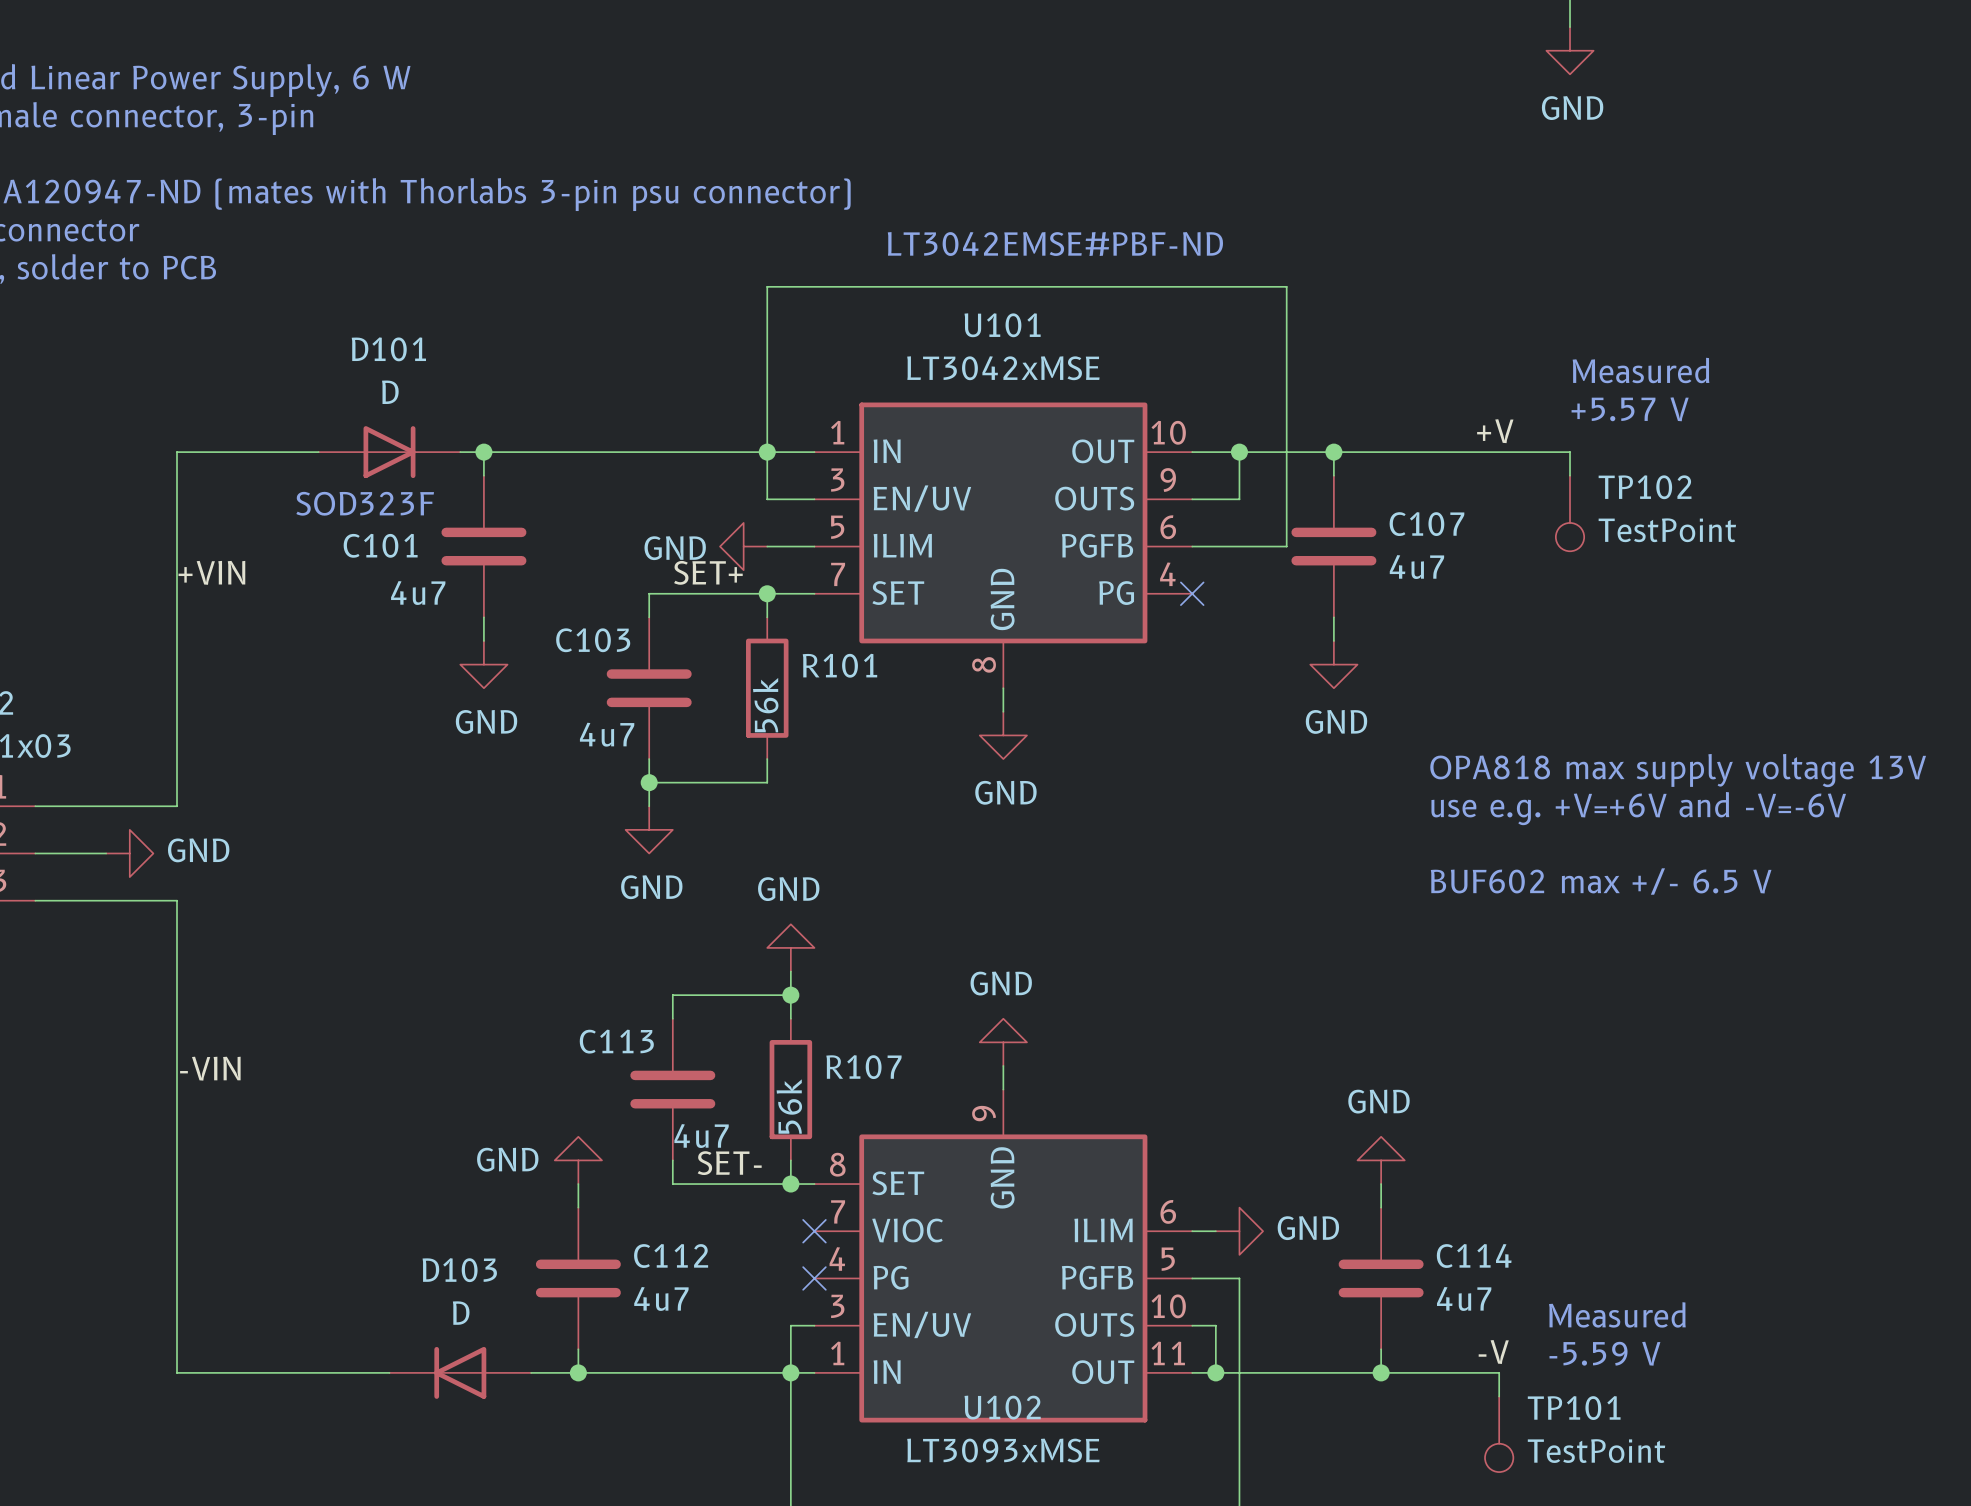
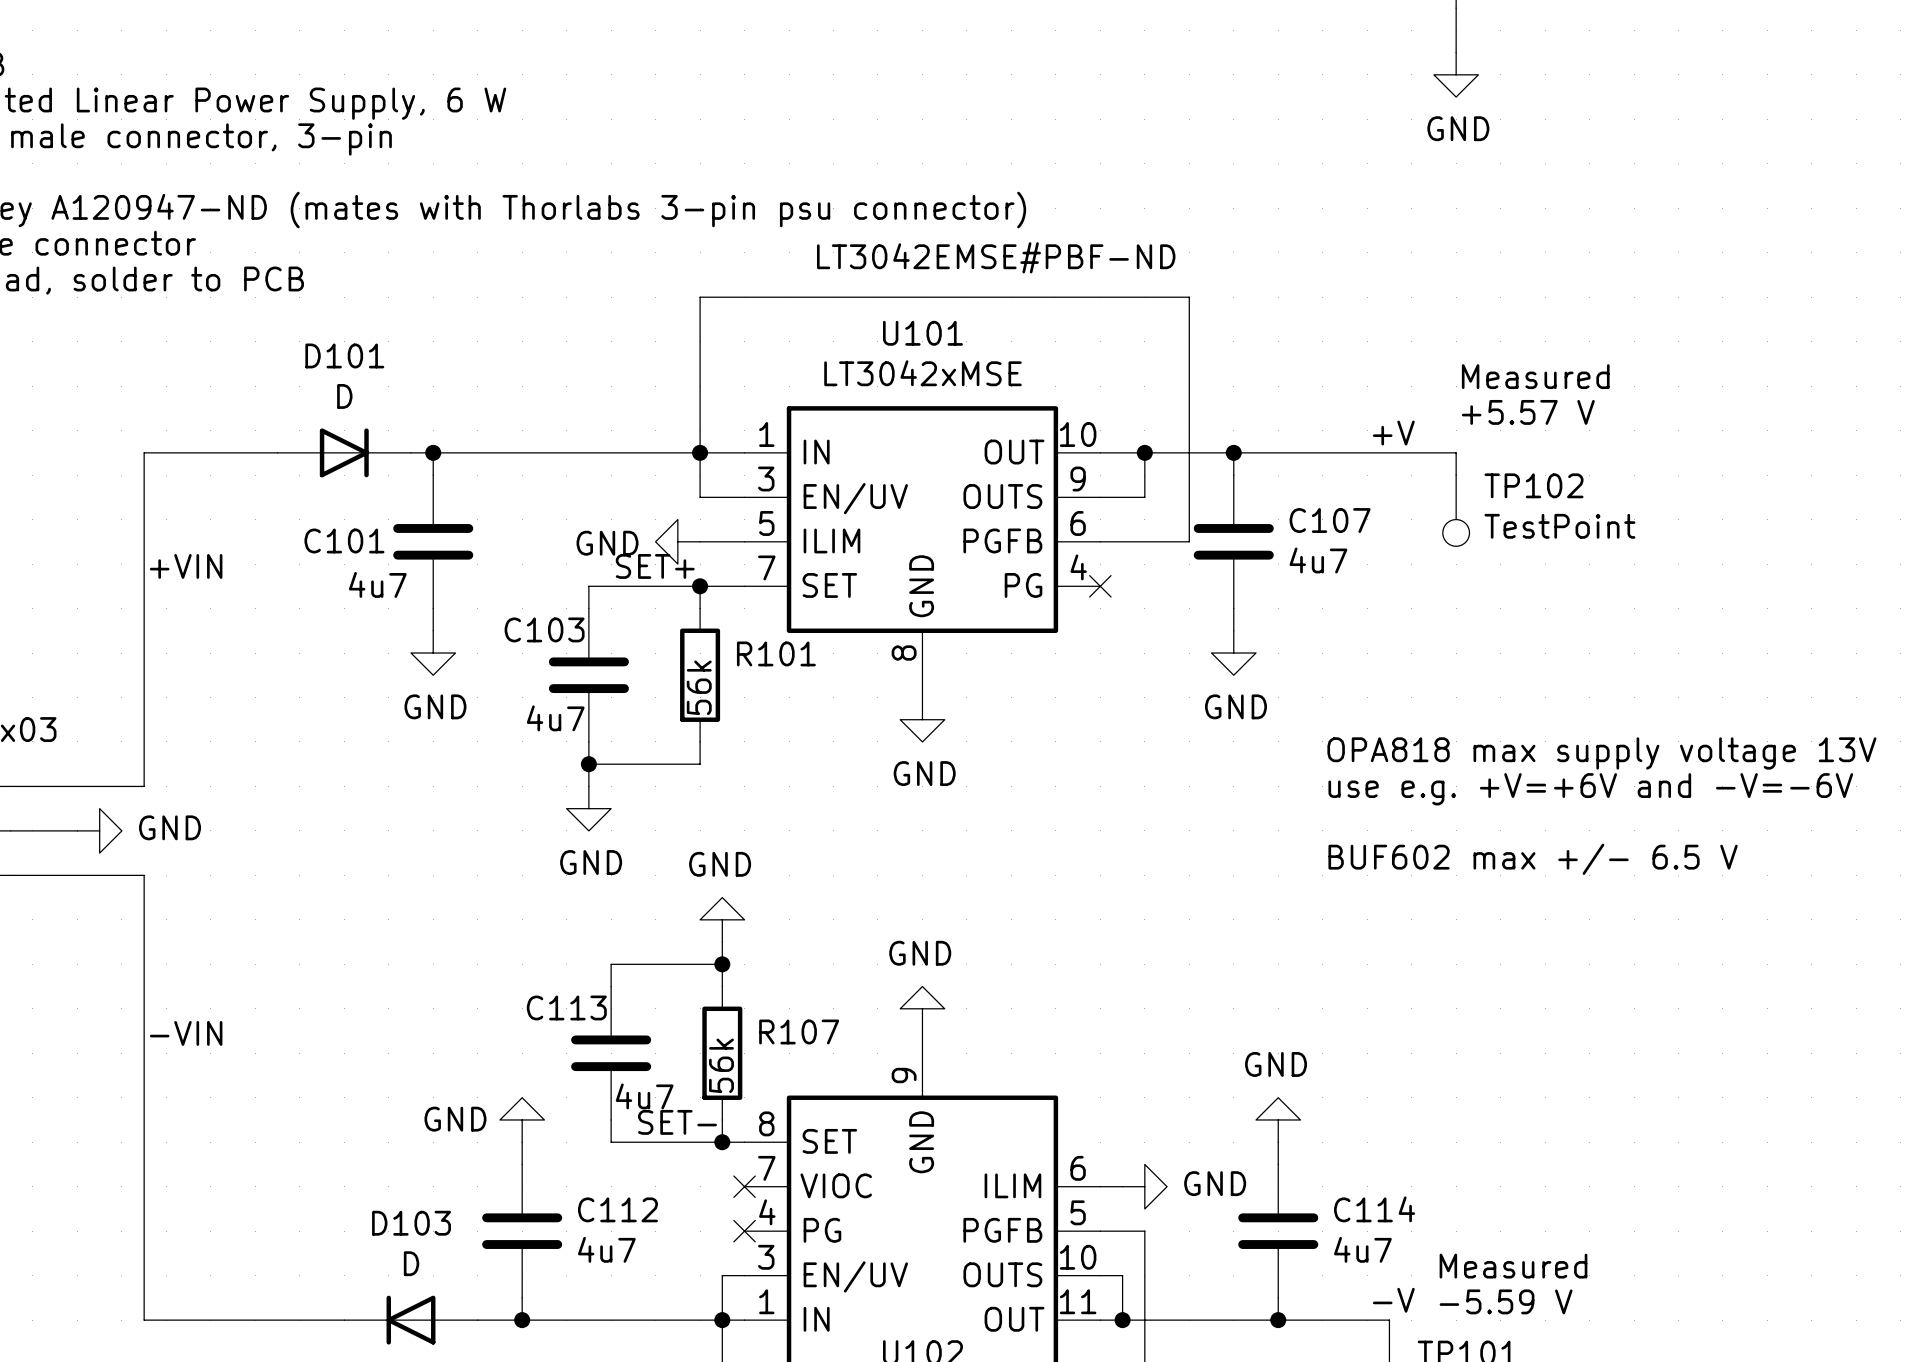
text: SOD323F (365, 503) -> none

